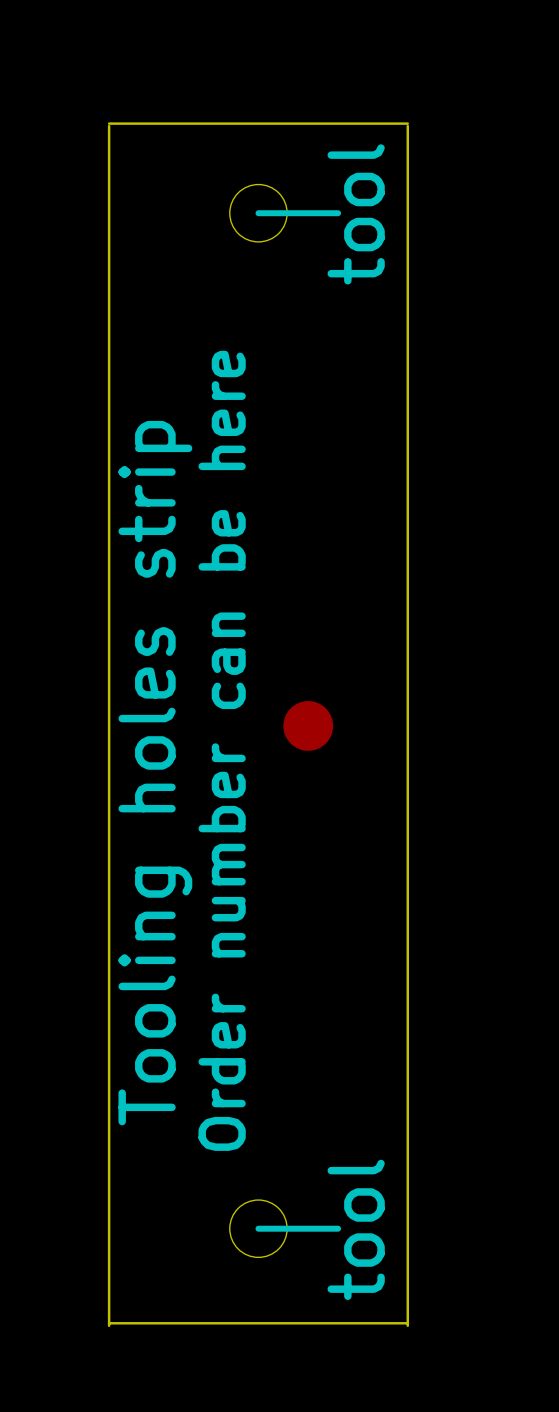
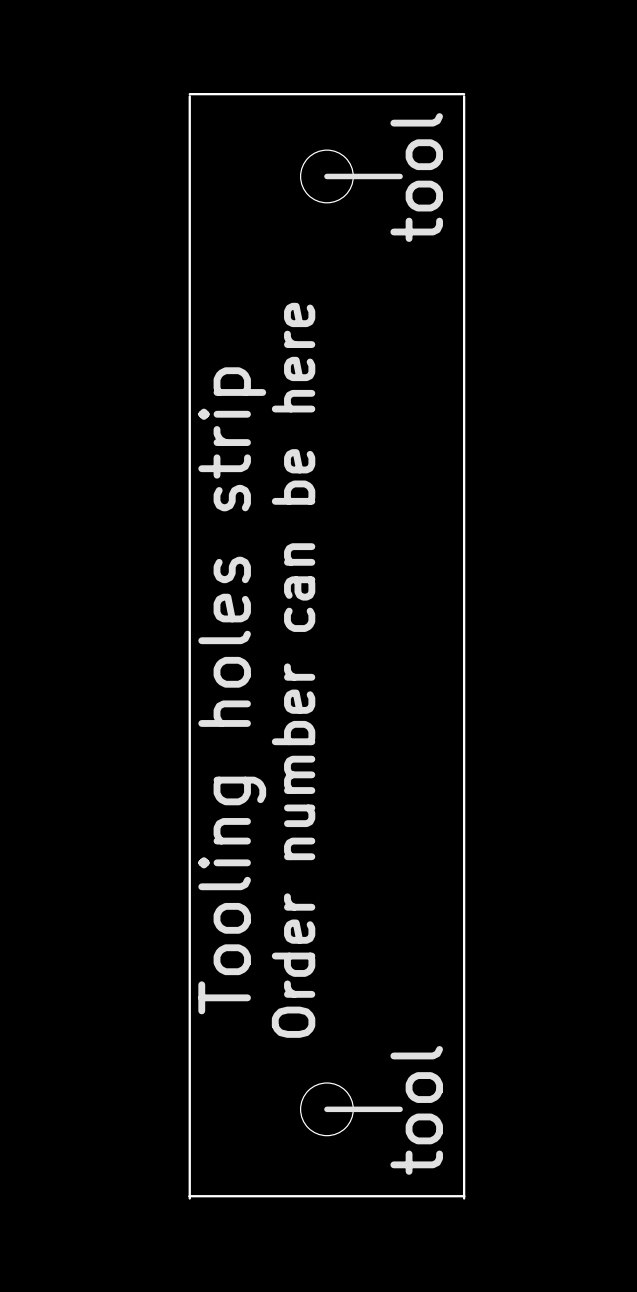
part: (308, 725) -> none

